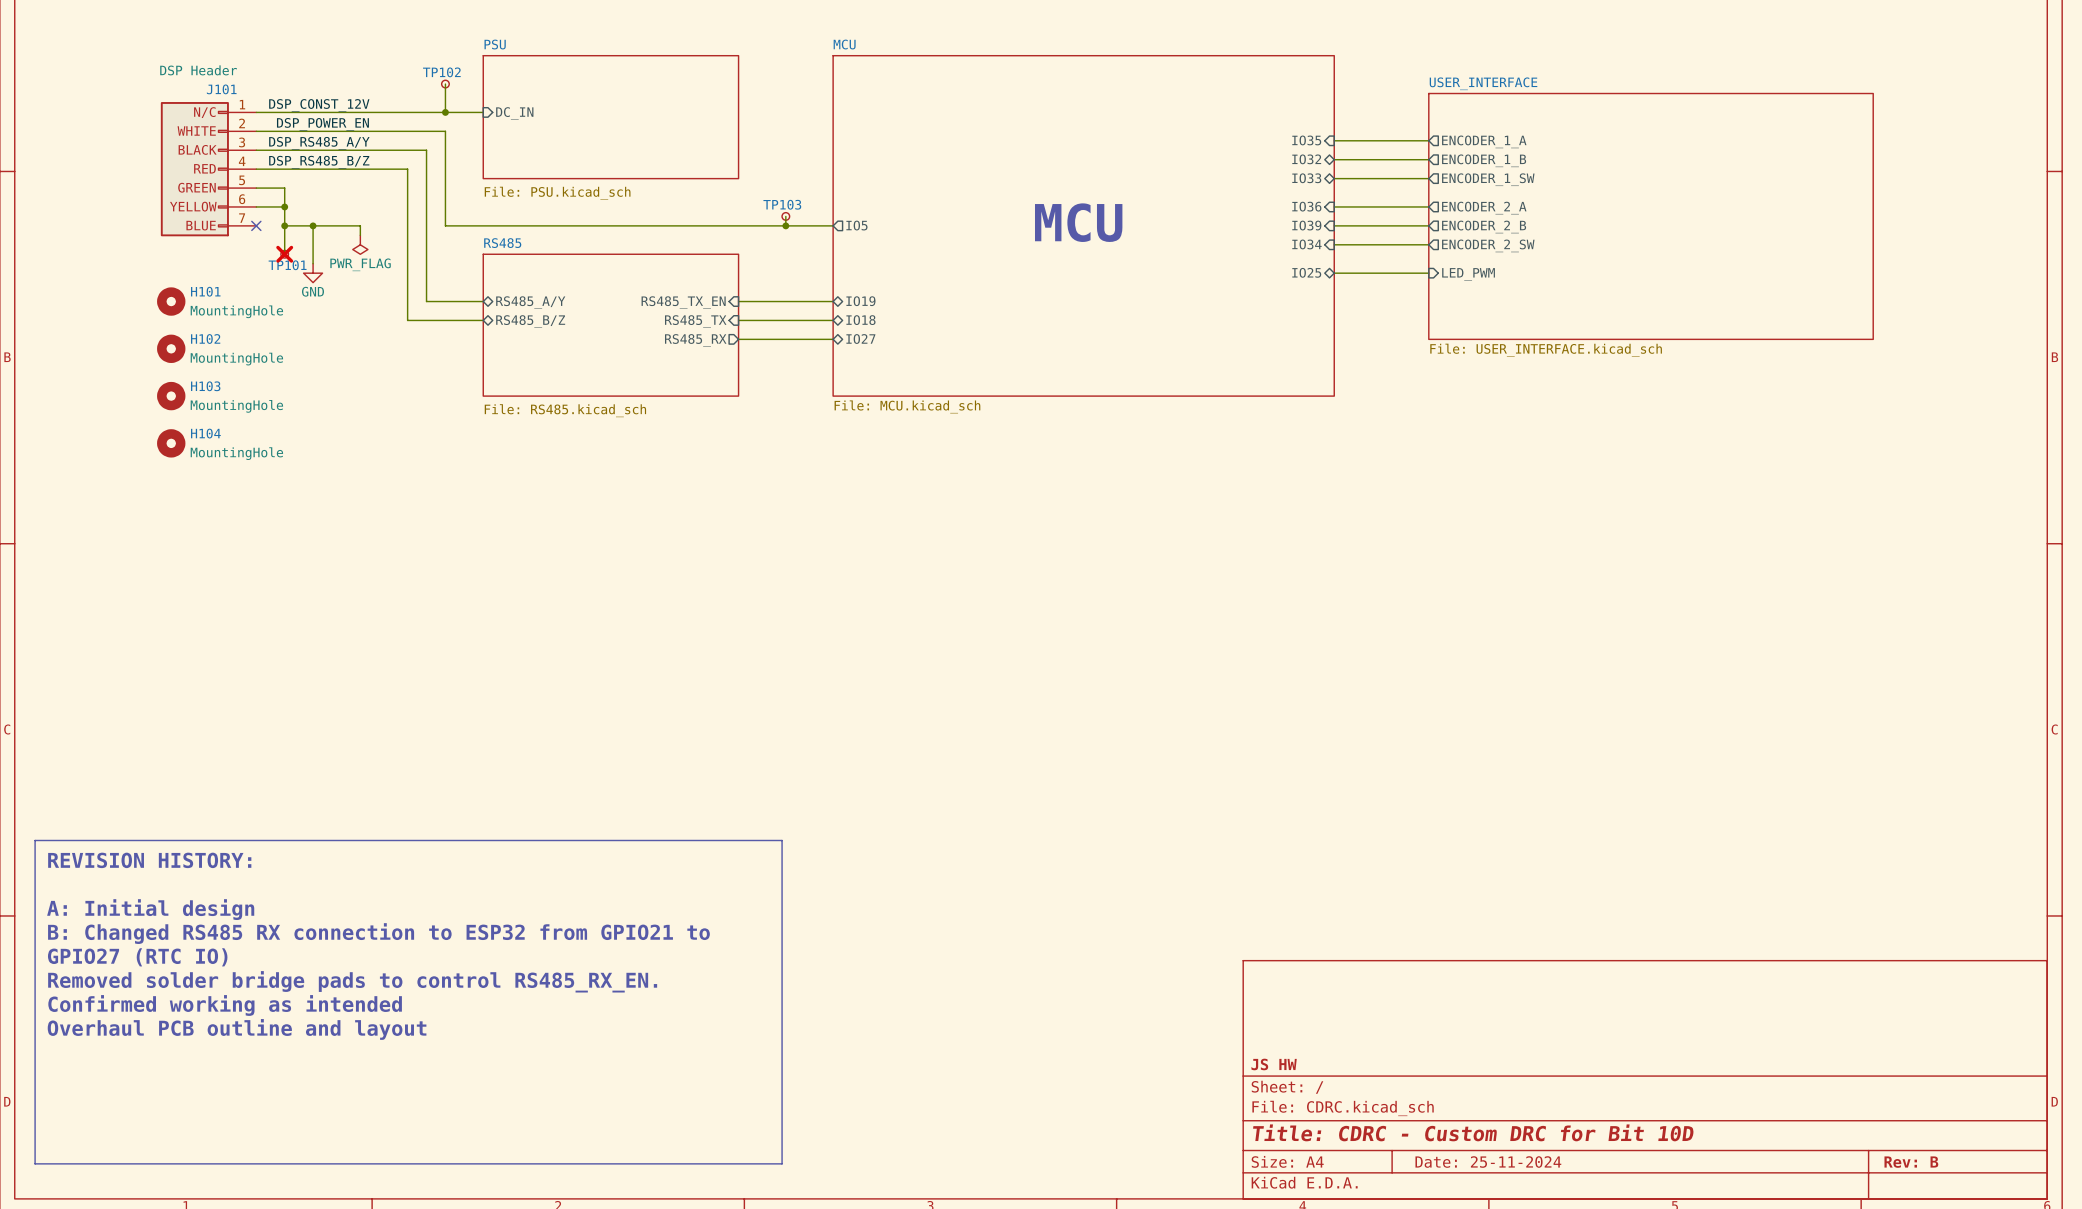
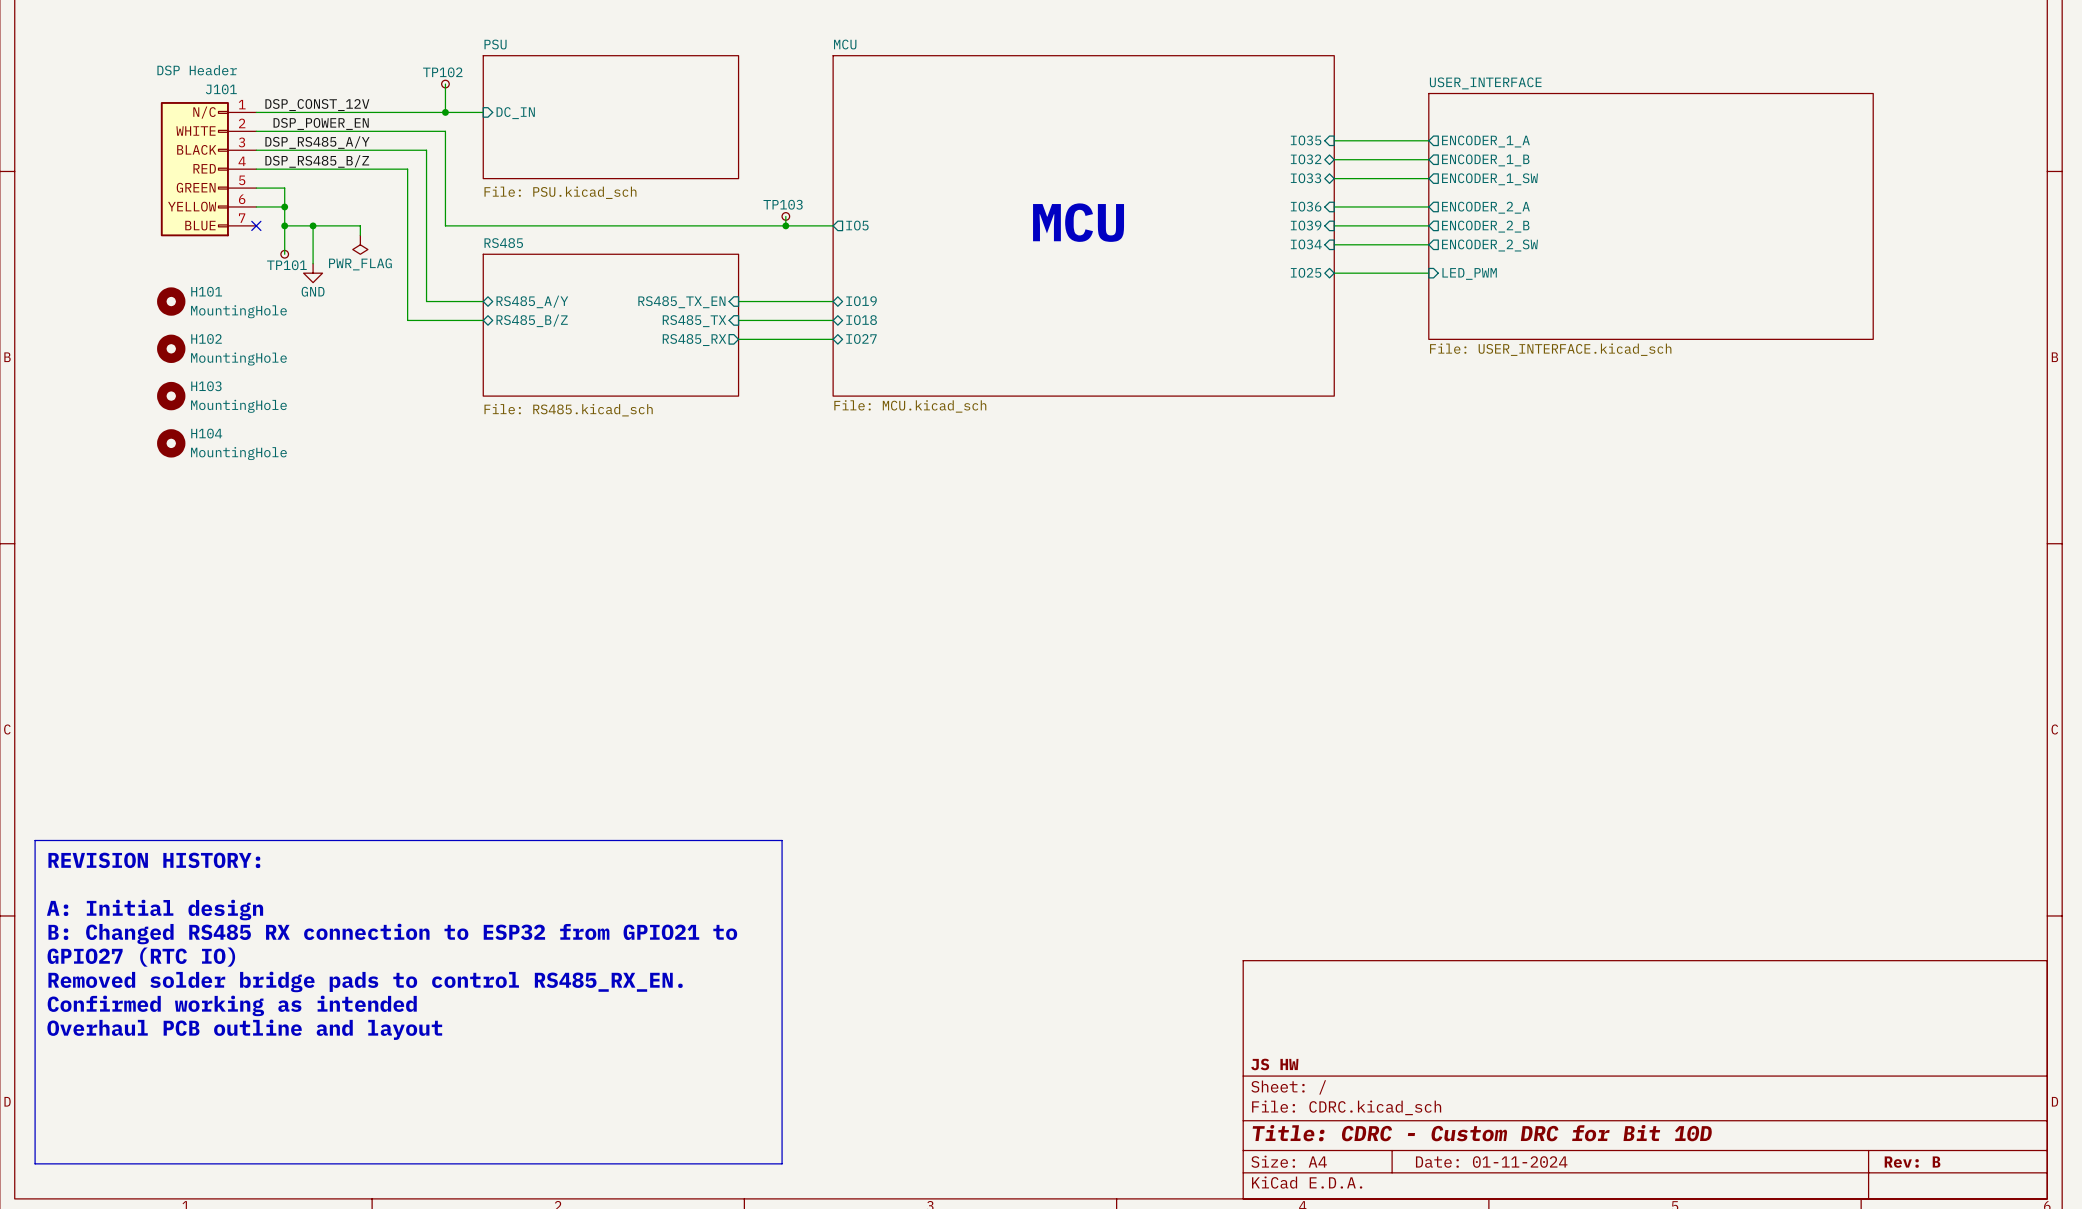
TP101 do-not-place cross: (284, 254) -> none
title block: Date: 25-11-2024 (1488, 1162) -> Date: 01-11-2024 (1491, 1162)

